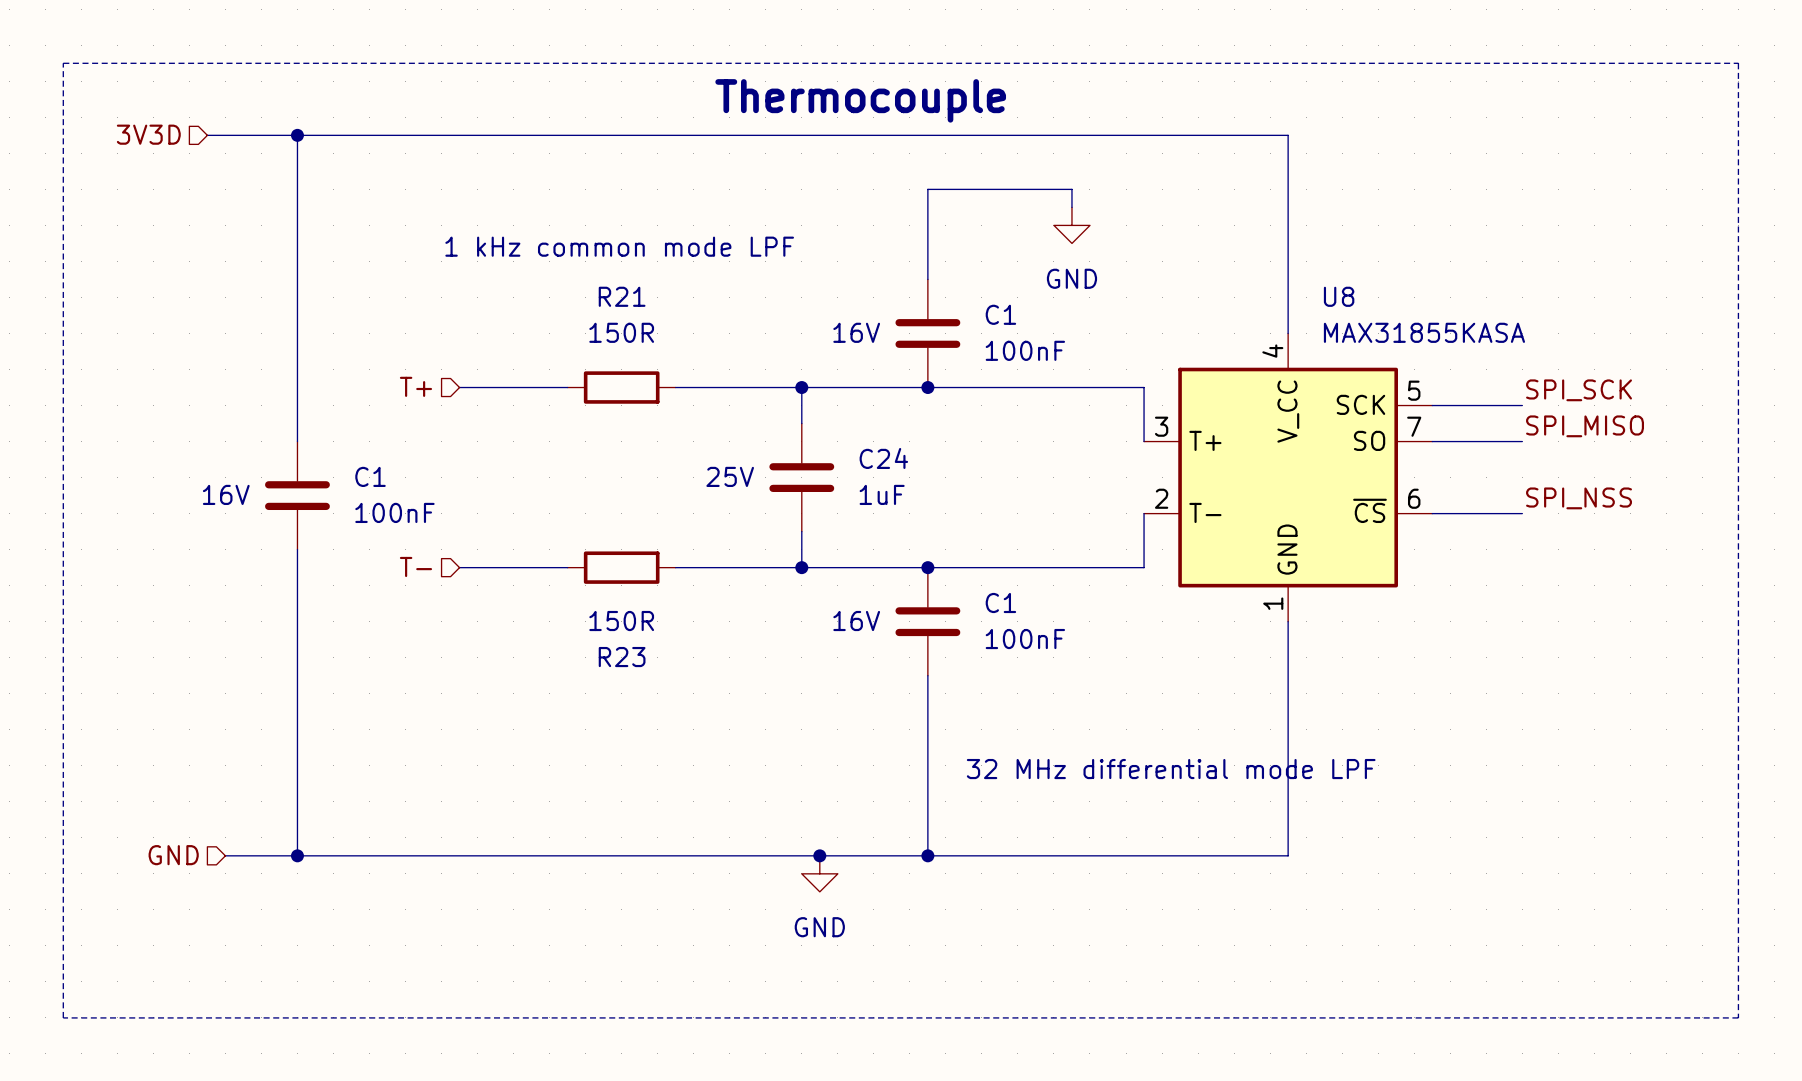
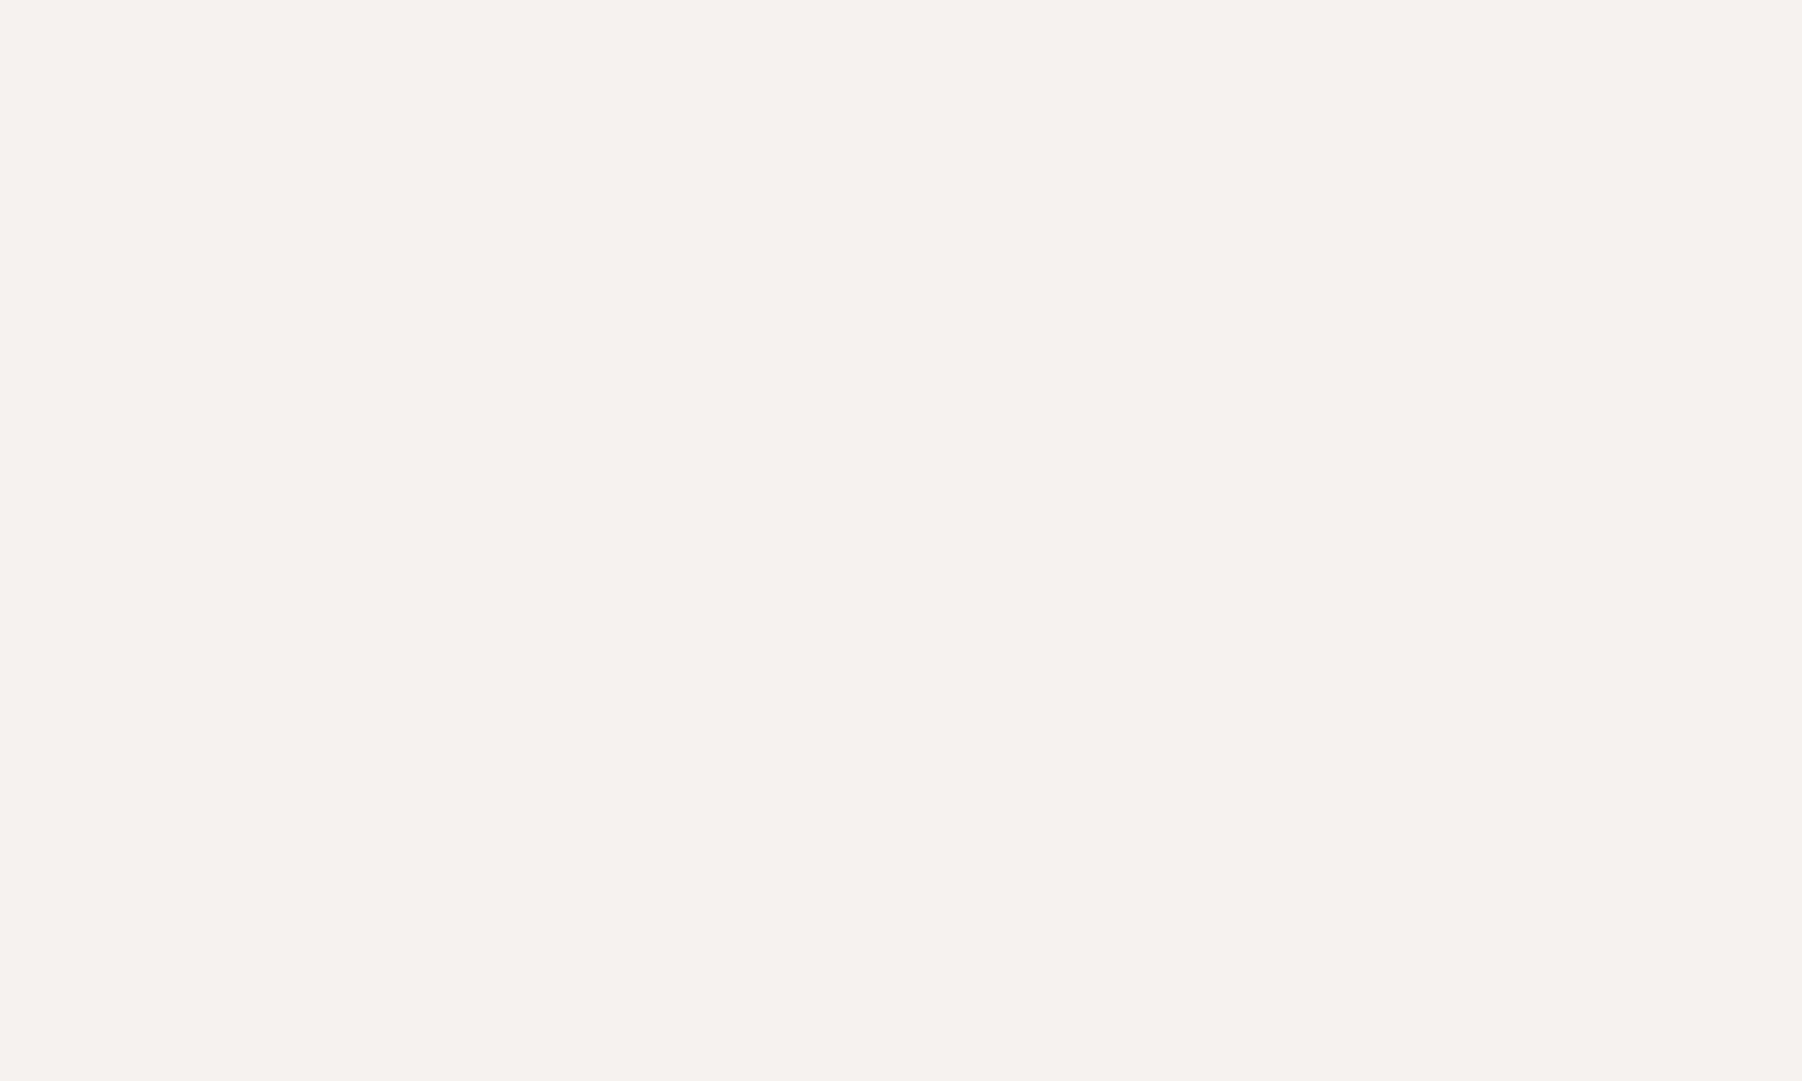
line: (63, 63) (1738, 63) (1738, 1017) (63, 1017) (63, 63) -> none
text: Thermocouple (860, 100) -> none
hierarchical label: 3V3D (148, 134) -> none
wire: (207, 135) (1288, 135) (1288, 333) -> none
wire: (297, 135) (297, 441) -> none
junction: (297, 135) -> none
wire: (1071, 207) (1071, 189) (927, 189) (927, 279) -> none
power symbol: GND (1071, 225) -> none
text: 1 kHz common mode LPF (619, 246) -> none
C1: 100nF (927, 333) -> none
hierarchical label: T+ (415, 386) -> none
wire: (459, 387) (567, 387) -> none
R21: 150R (621, 387) -> none
wire: (675, 387) (1144, 387) (1144, 441) -> none
wire: (801, 387) (801, 423) -> none
junction: (801, 387) -> none
junction: (927, 387) -> none
label: SPI_SCK (1579, 390) -> none
wire: (1432, 405) (1522, 405) -> none
label: SPI_MISO (1585, 426) -> none
wire: (1432, 441) (1522, 441) -> none
C24: 1uF (801, 477) -> none
U8: MAX31855KASA (1288, 477) -> none
C1: 100nF (297, 495) -> none
label: SPI_NSS (1579, 498) -> none
wire: (1144, 513) (1144, 567) (675, 567) -> none
wire: (1432, 513) (1522, 513) -> none
wire: (801, 531) (801, 567) -> none
wire: (297, 549) (297, 855) -> none
hierarchical label: T- (415, 566) -> none
wire: (459, 567) (567, 567) -> none
R23: 150R (621, 567) -> none
junction: (801, 567) -> none
junction: (927, 567) -> none
C1: 100nF (927, 621) -> none
wire: (1288, 621) (1288, 855) (225, 855) -> none
wire: (927, 675) (927, 855) -> none
text: 32 MHz differential mode LPF (1171, 769) -> none
hierarchical label: GND (173, 855) -> none
junction: (297, 855) -> none
junction: (819, 855) -> none
junction: (927, 855) -> none
power symbol: GND (819, 873) -> none

